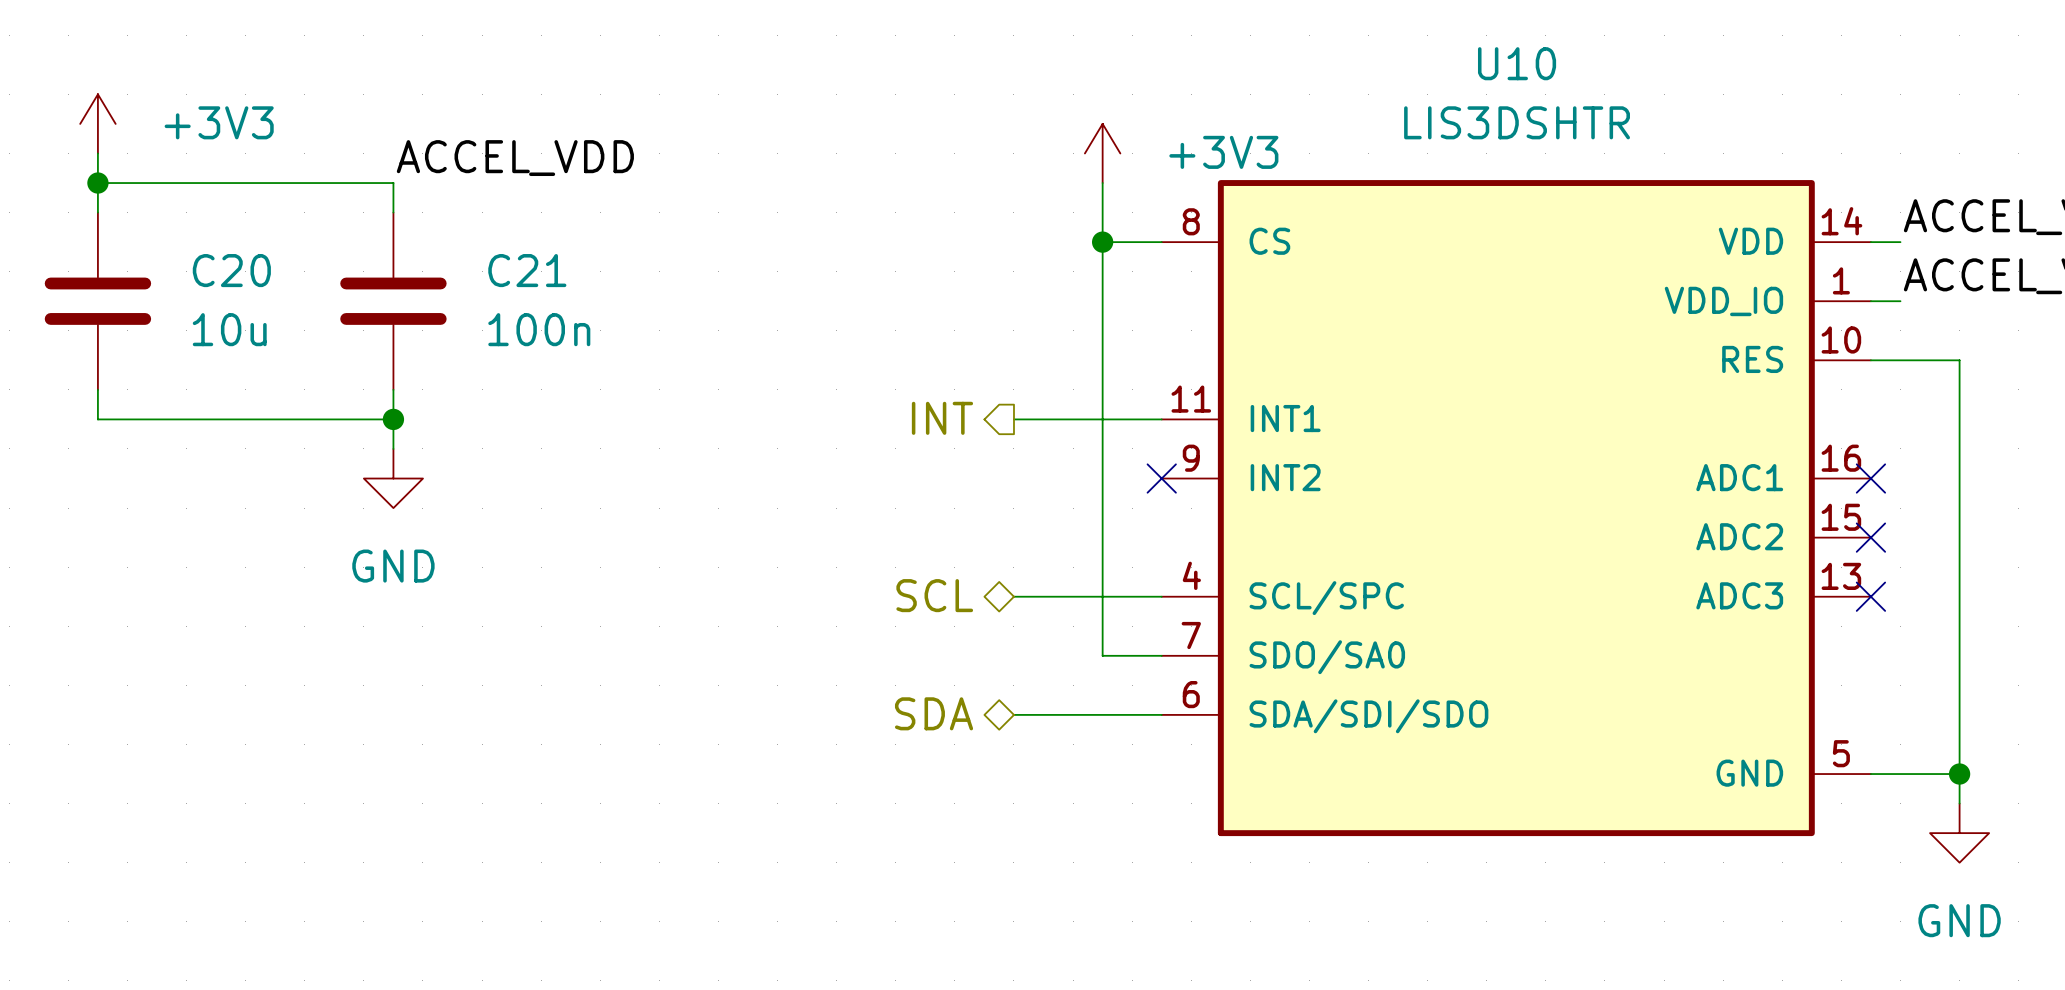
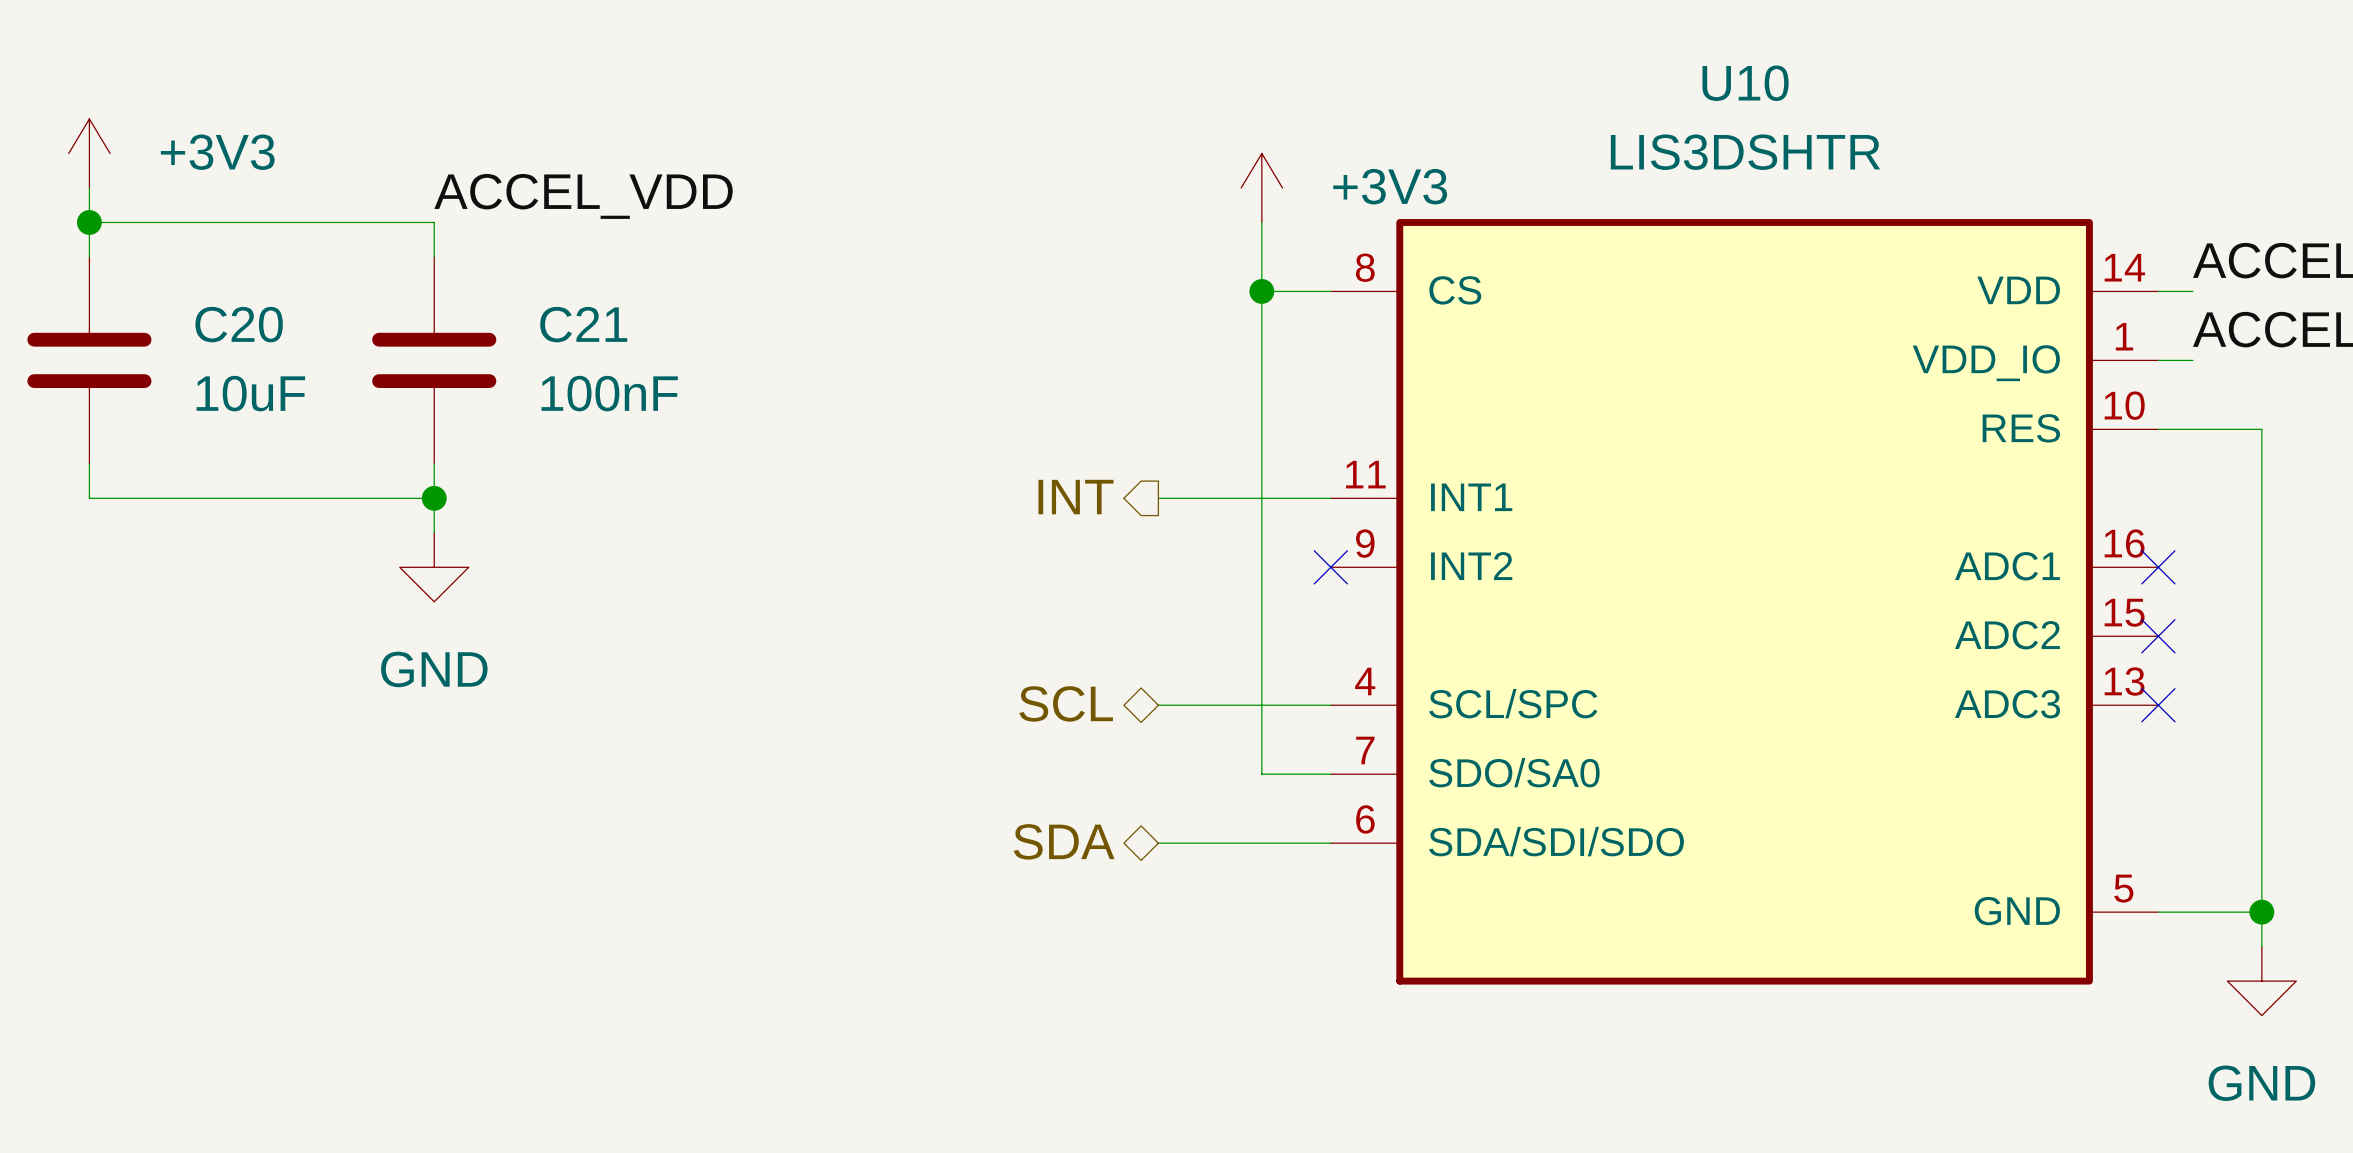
C20 value: 10u (229, 329) -> 10uF (250, 393)
C21 value: 100n (539, 329) -> 100nF (609, 393)

